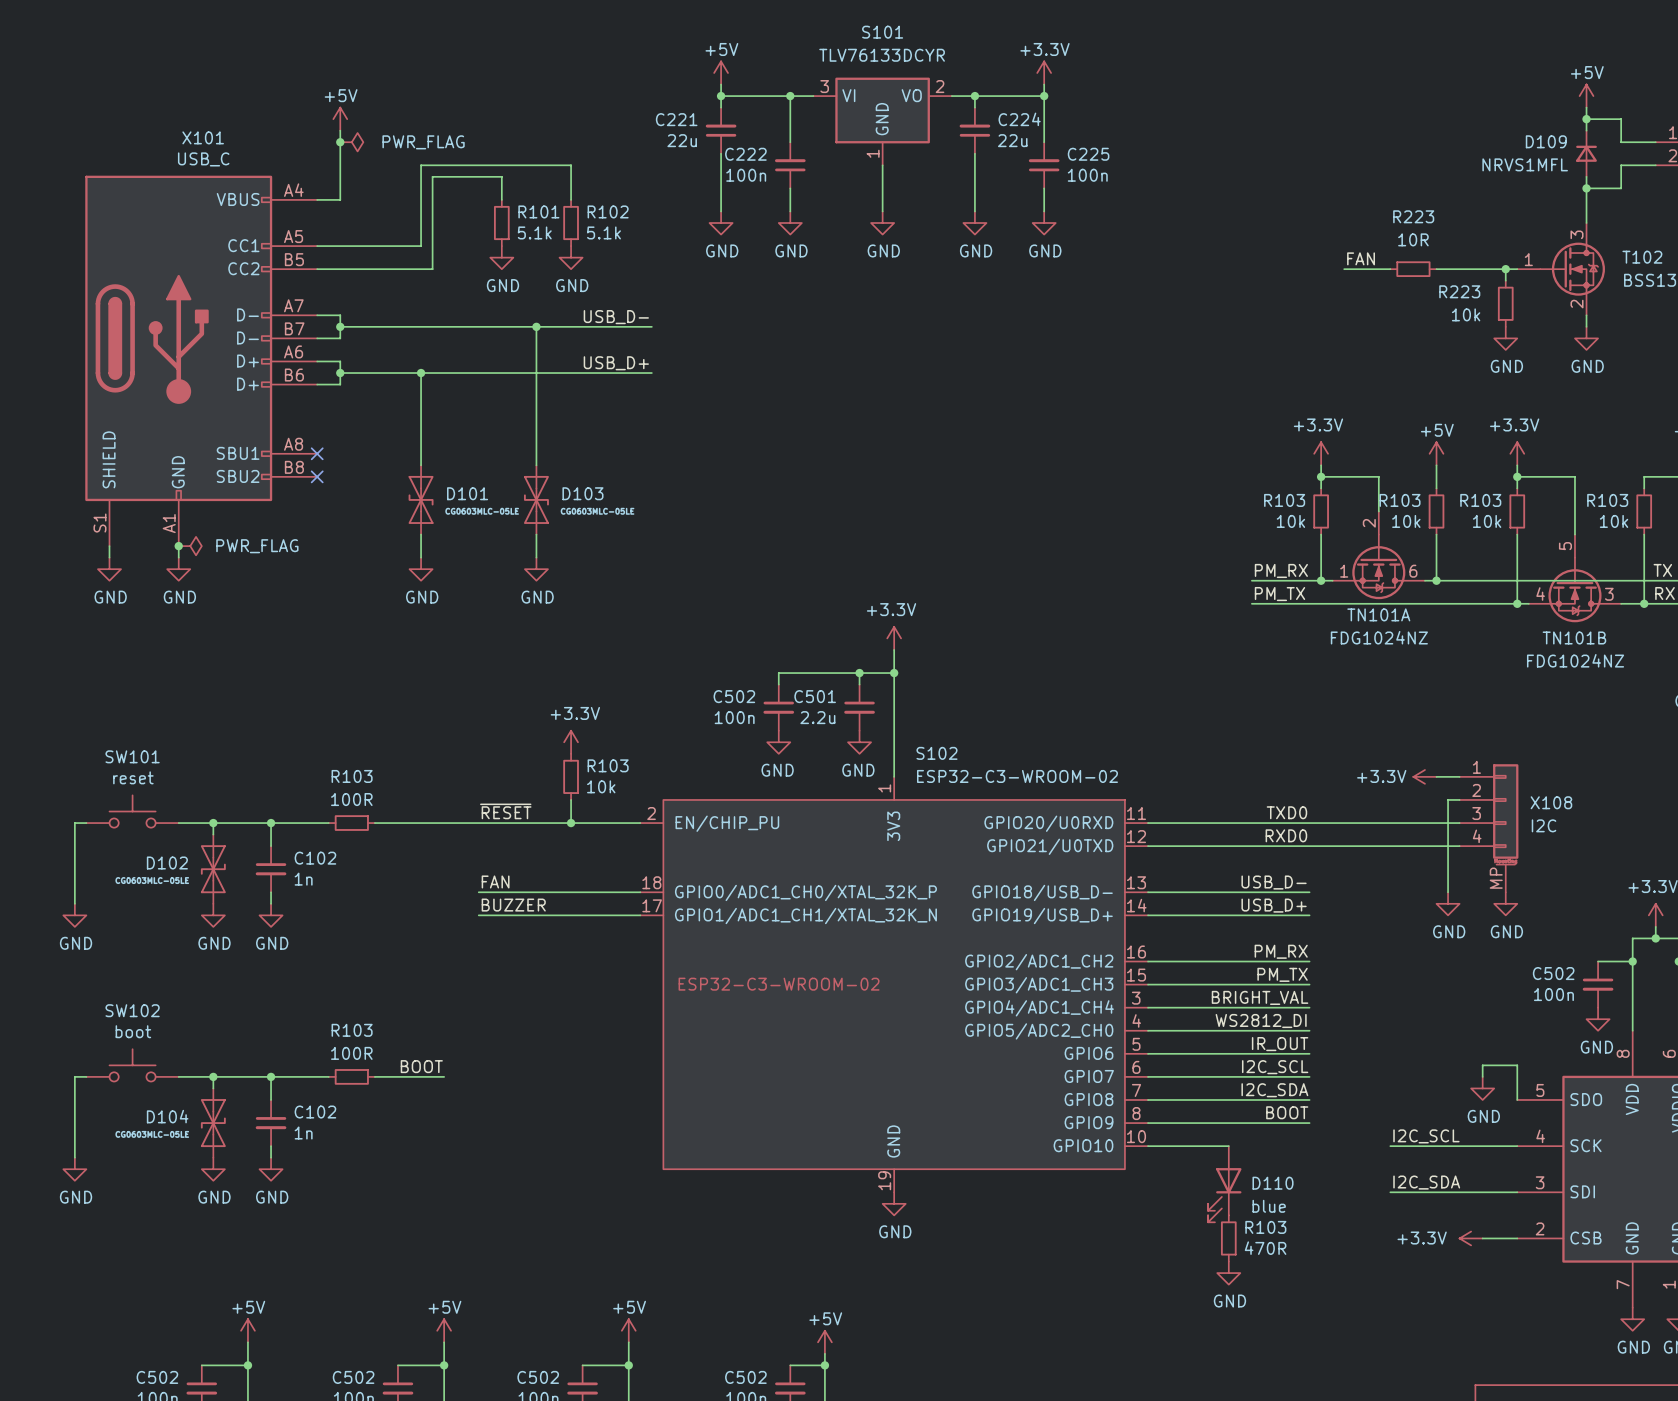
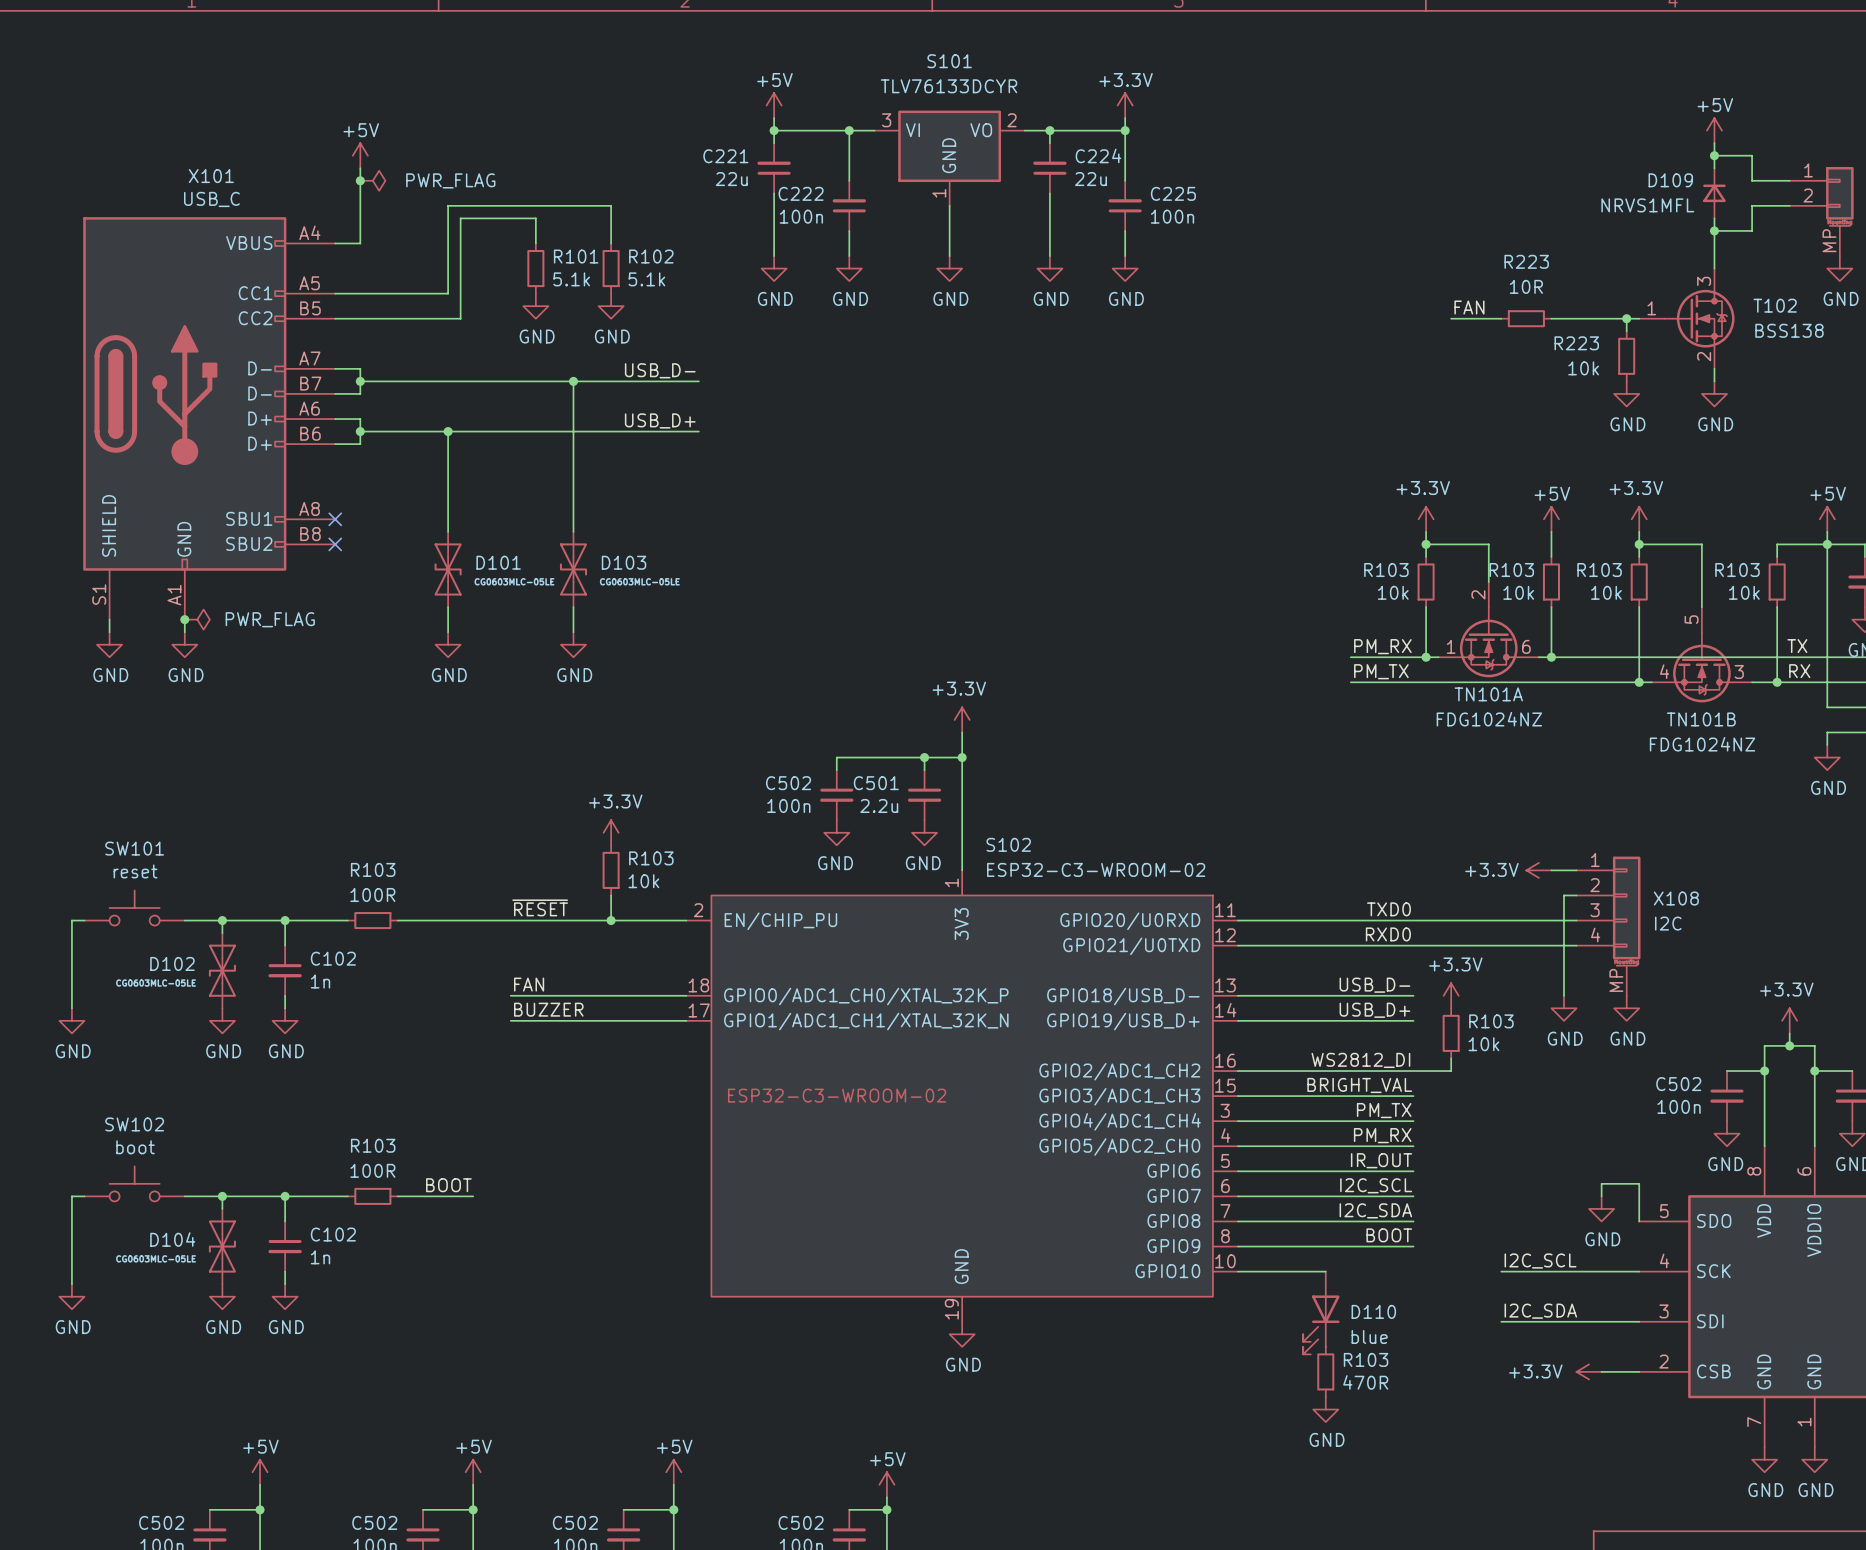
power symbol: none -> +3.3V (1451, 995)
R103: none -> 10k (1451, 1033)
wire: none -> (1451, 1058) (1451, 1071) (1413, 1071)
label: PM_RX (1281, 951) -> WS2812_DI (1360, 1060)
label: PM_TX (1282, 974) -> BRIGHT_VAL (1359, 1085)
label: BRIGHT_VAL (1260, 997) -> PM_TX (1384, 1110)
label: WS2812_DI (1261, 1021) -> PM_RX (1382, 1135)

